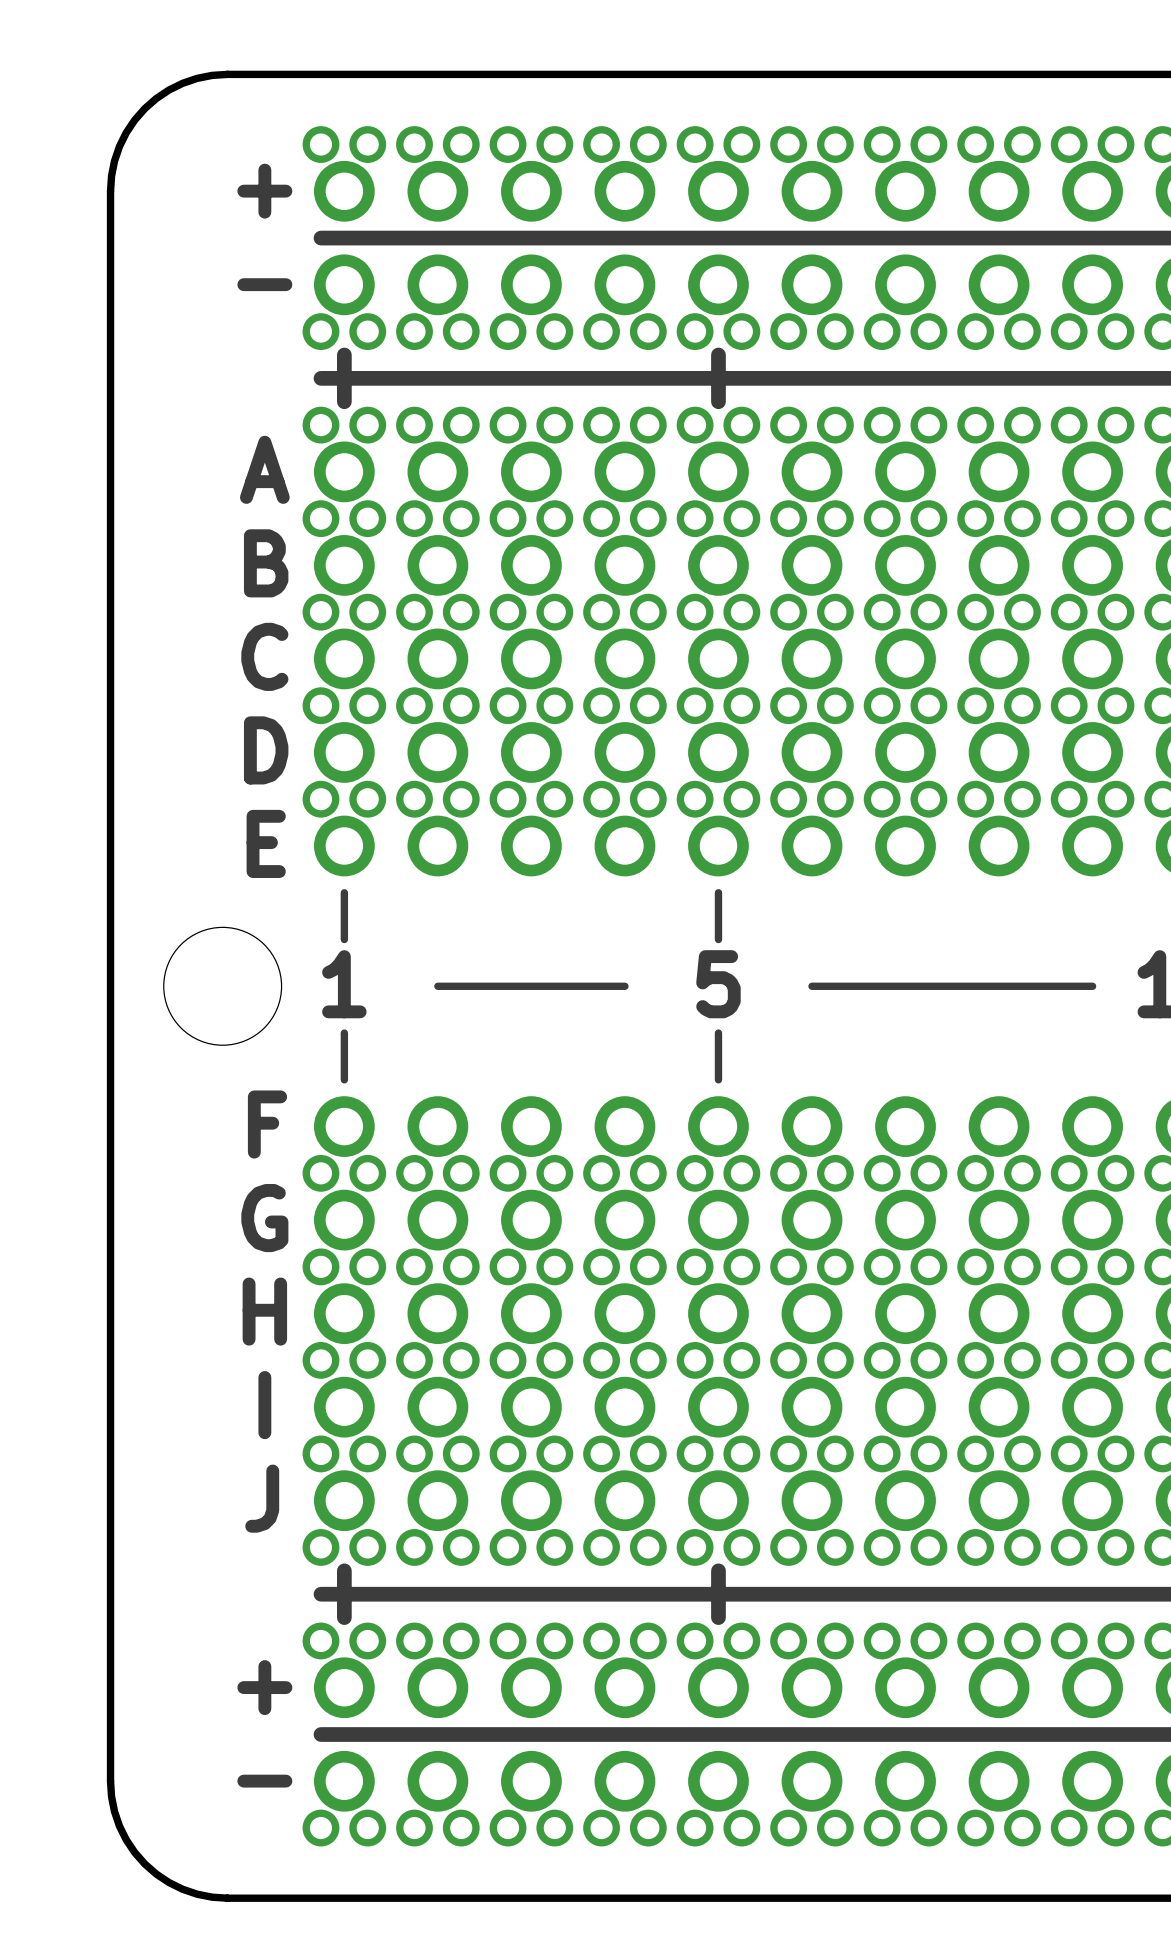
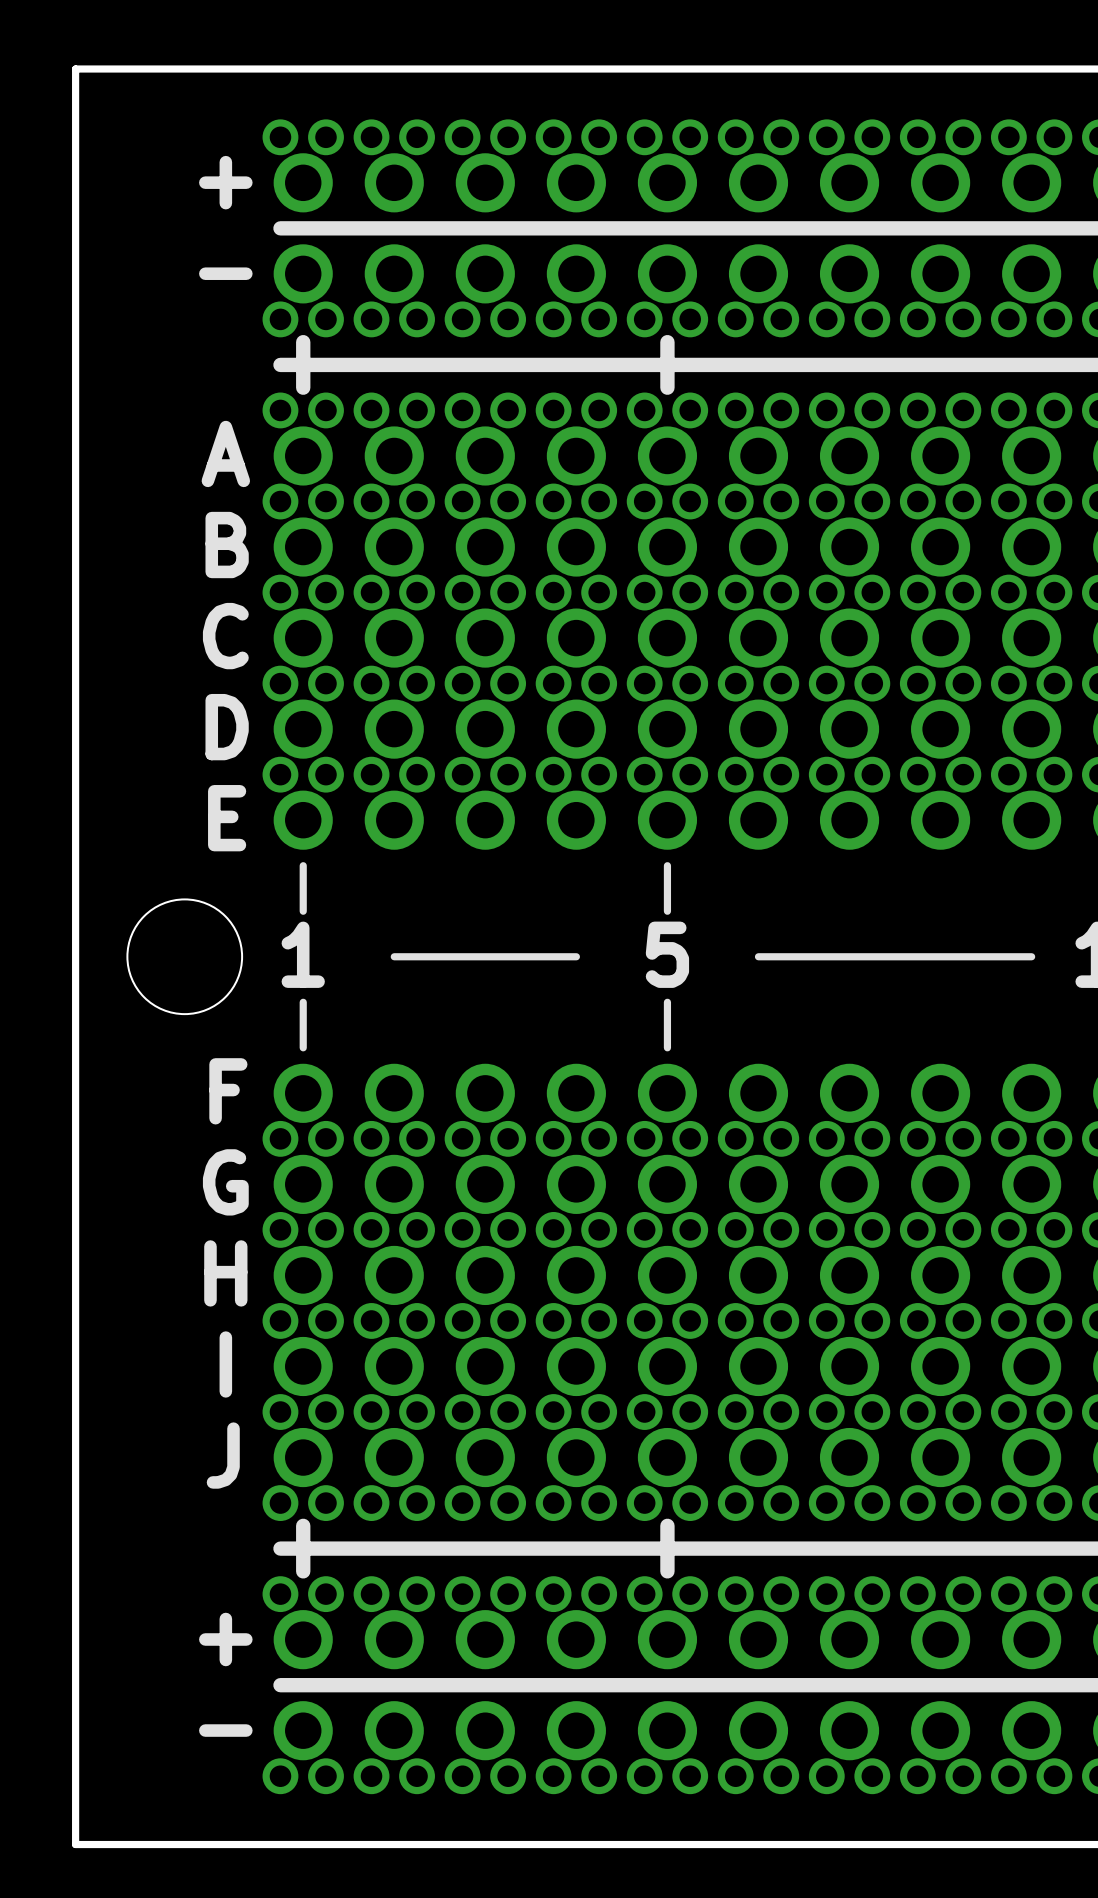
board edge: (227, 74) (212, 75) (182, 83) (156, 98) (144, 108) (126, 132) (119, 146) (114, 161) (110, 191) -> (189, 69) (75, 69) (75, 182)
board edge: (110, 1781) (114, 1811) (119, 1826) (126, 1839) (144, 1863) (156, 1874) (182, 1889) (197, 1894) (227, 1898) -> (75, 1730) (75, 1844) (189, 1844)

